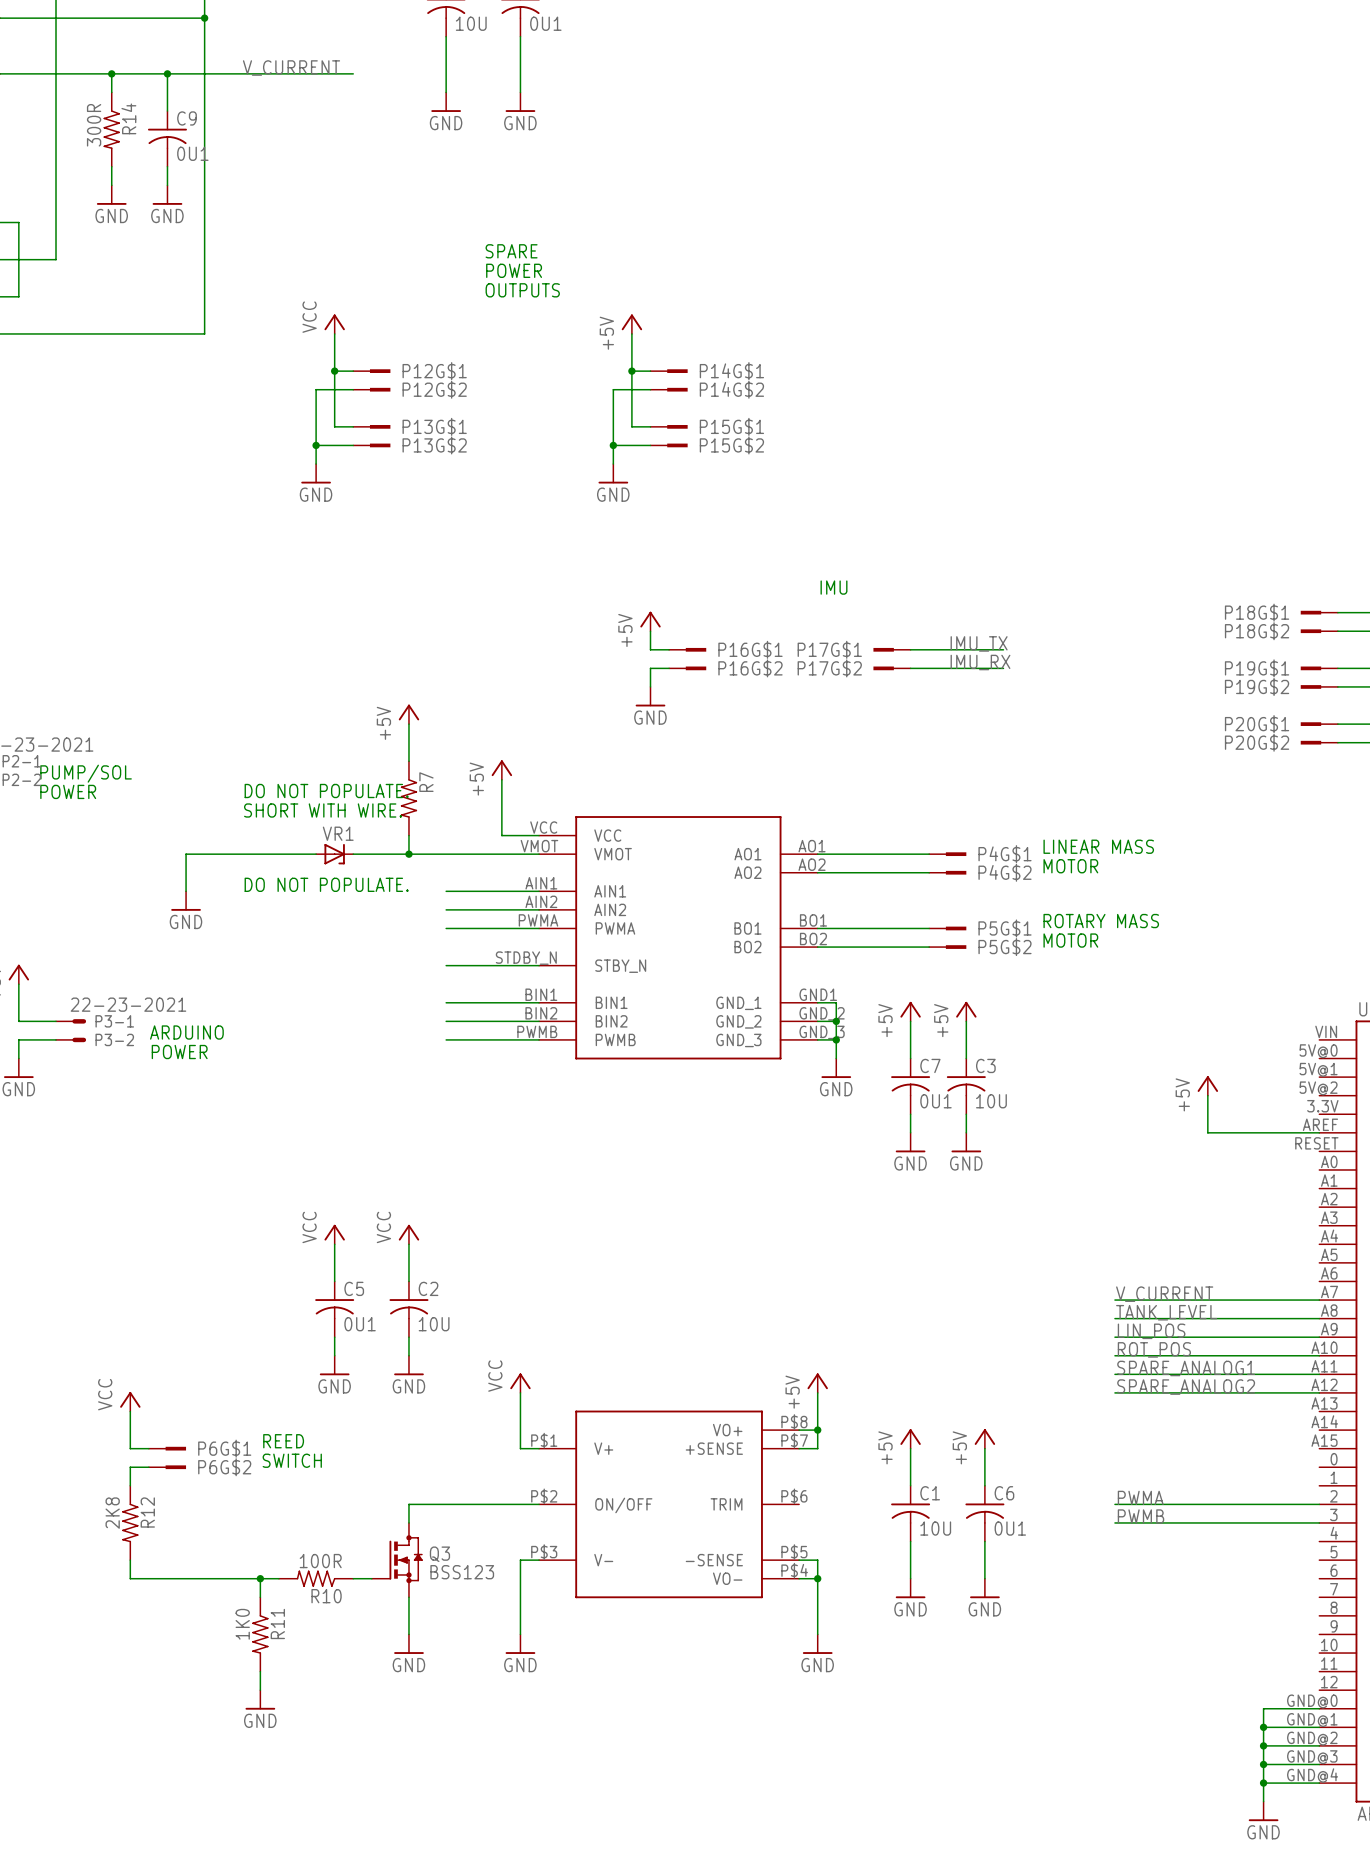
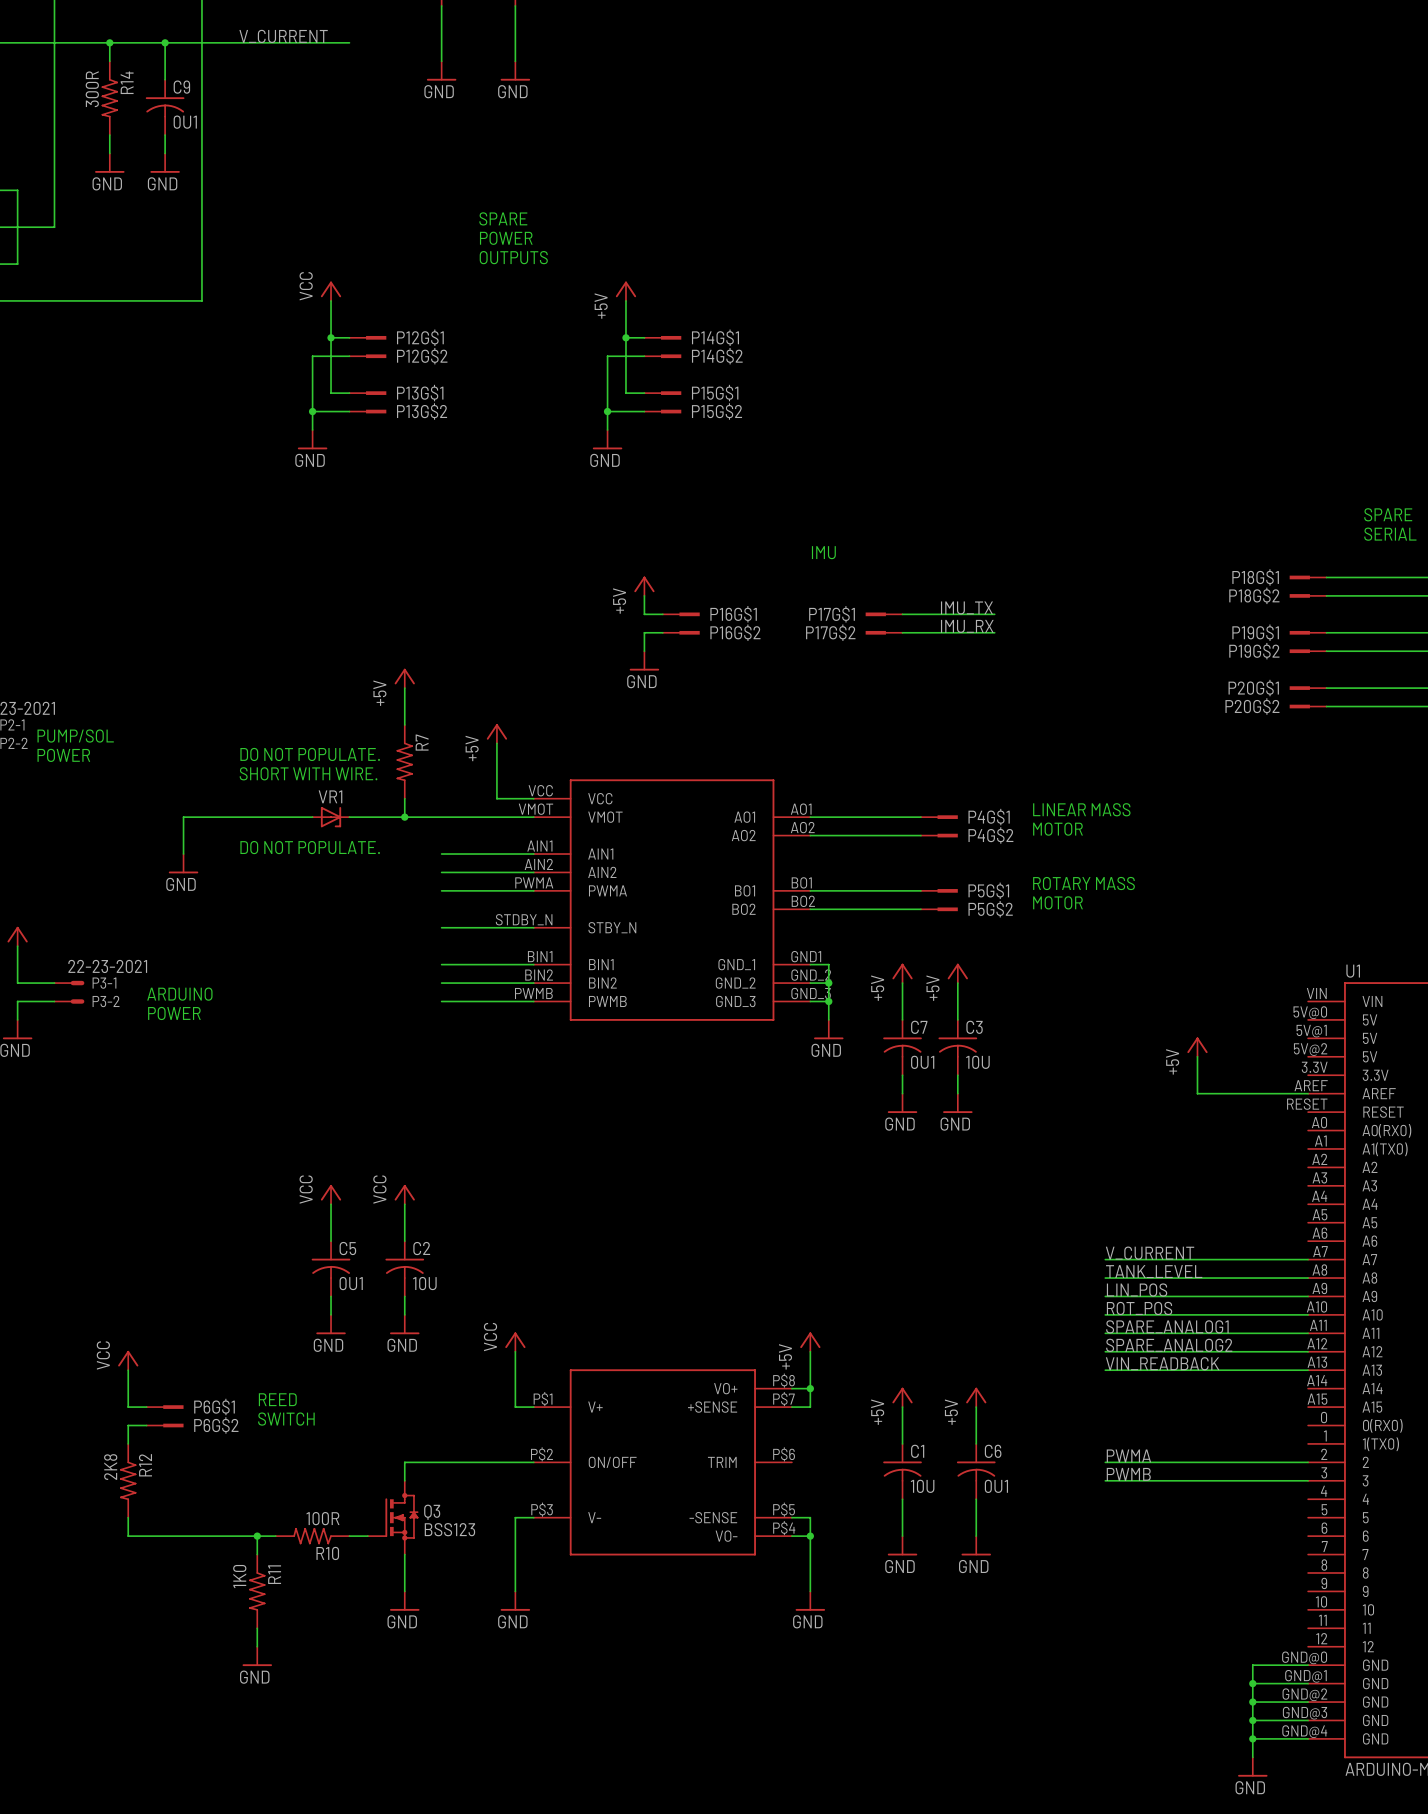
label: none -> VIN_READBACK (1162, 1363)
wire: none -> (1105, 1370) (1308, 1370)

